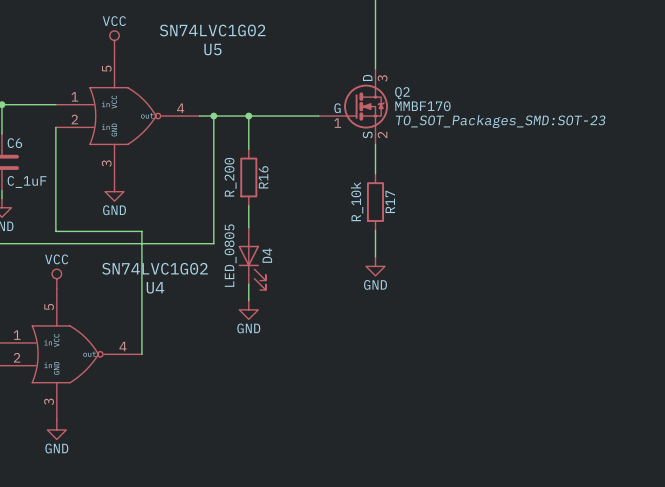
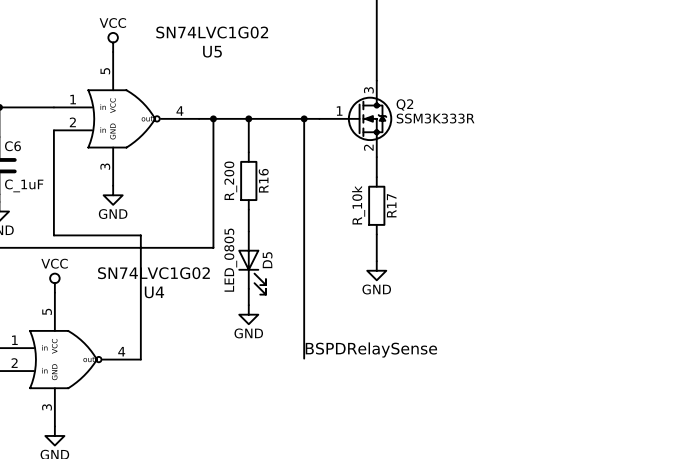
Q2 symbol: [318, 68, 388, 145] -> [319, 80, 393, 158]
Q2 value: MMBF170 (422, 106) -> SSM3K333R (435, 118)
wire: none -> (304, 118) (304, 358)
junction: none -> (304, 118)
Q2 text: TO_SOT_Packages_SMD:SOT-23 (500, 121) -> none
D4 name: D4 (267, 255) -> D5 (267, 260)
label: none -> BSPDRelaySense (371, 350)

